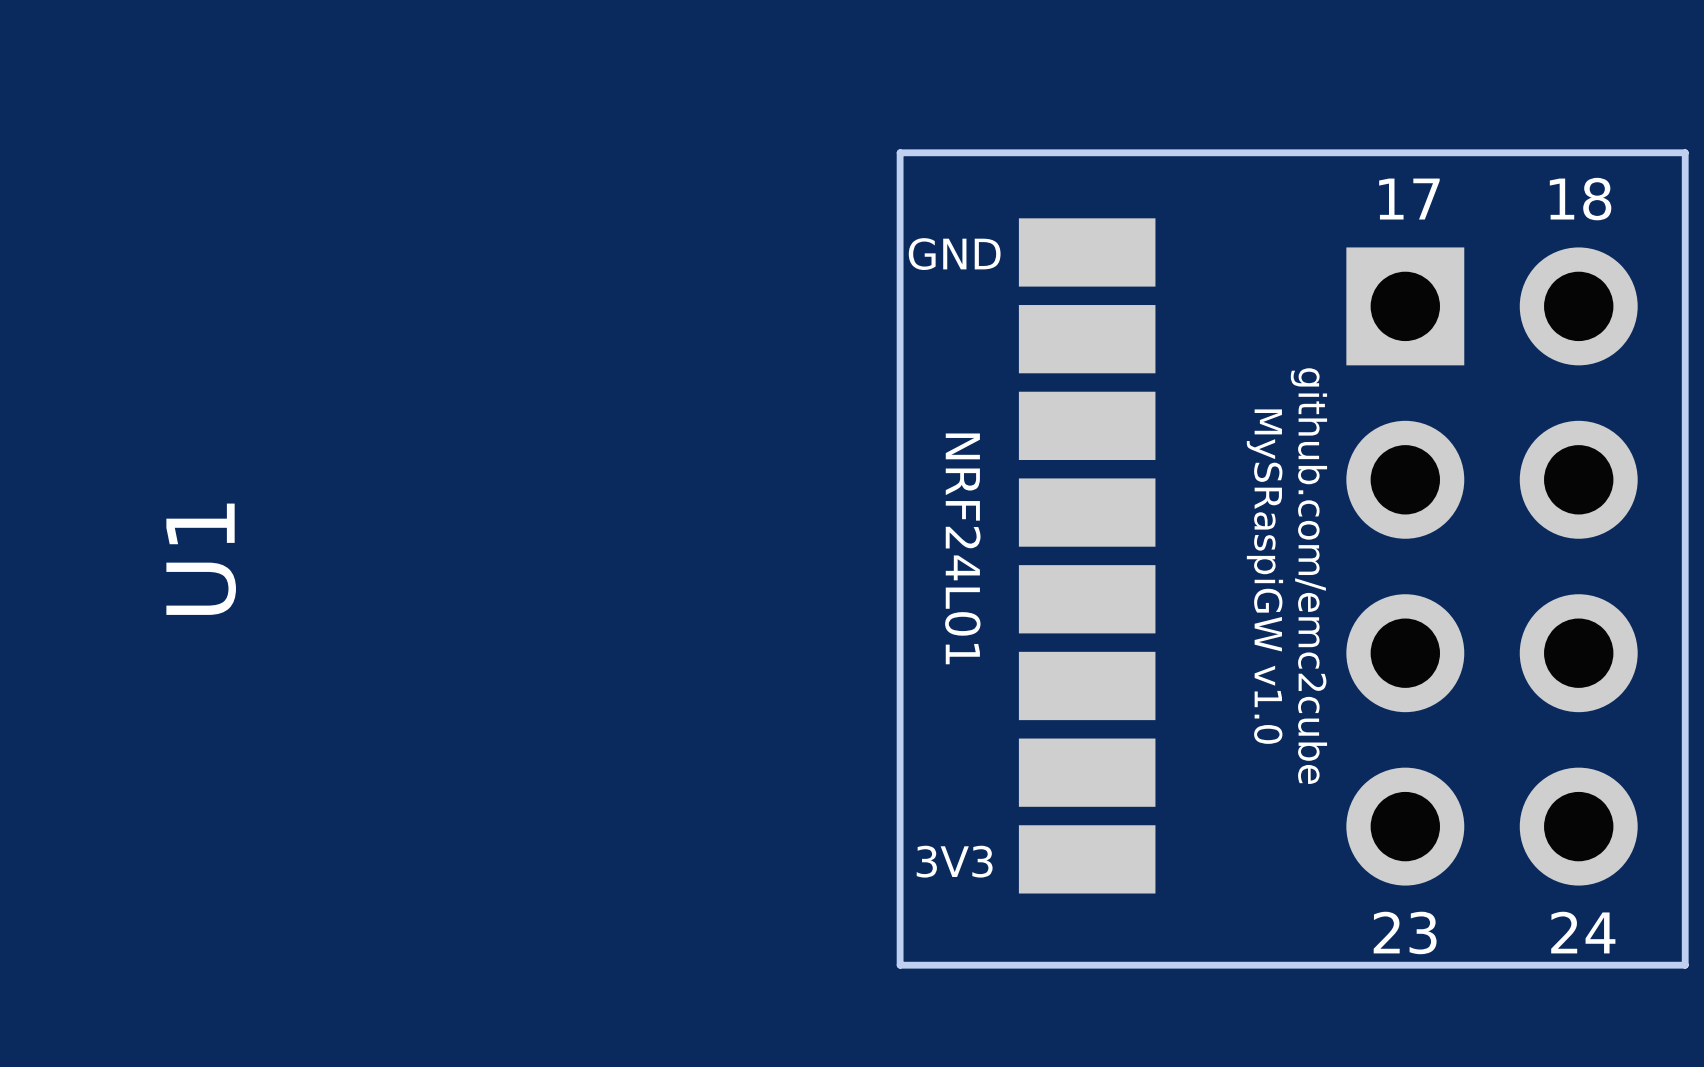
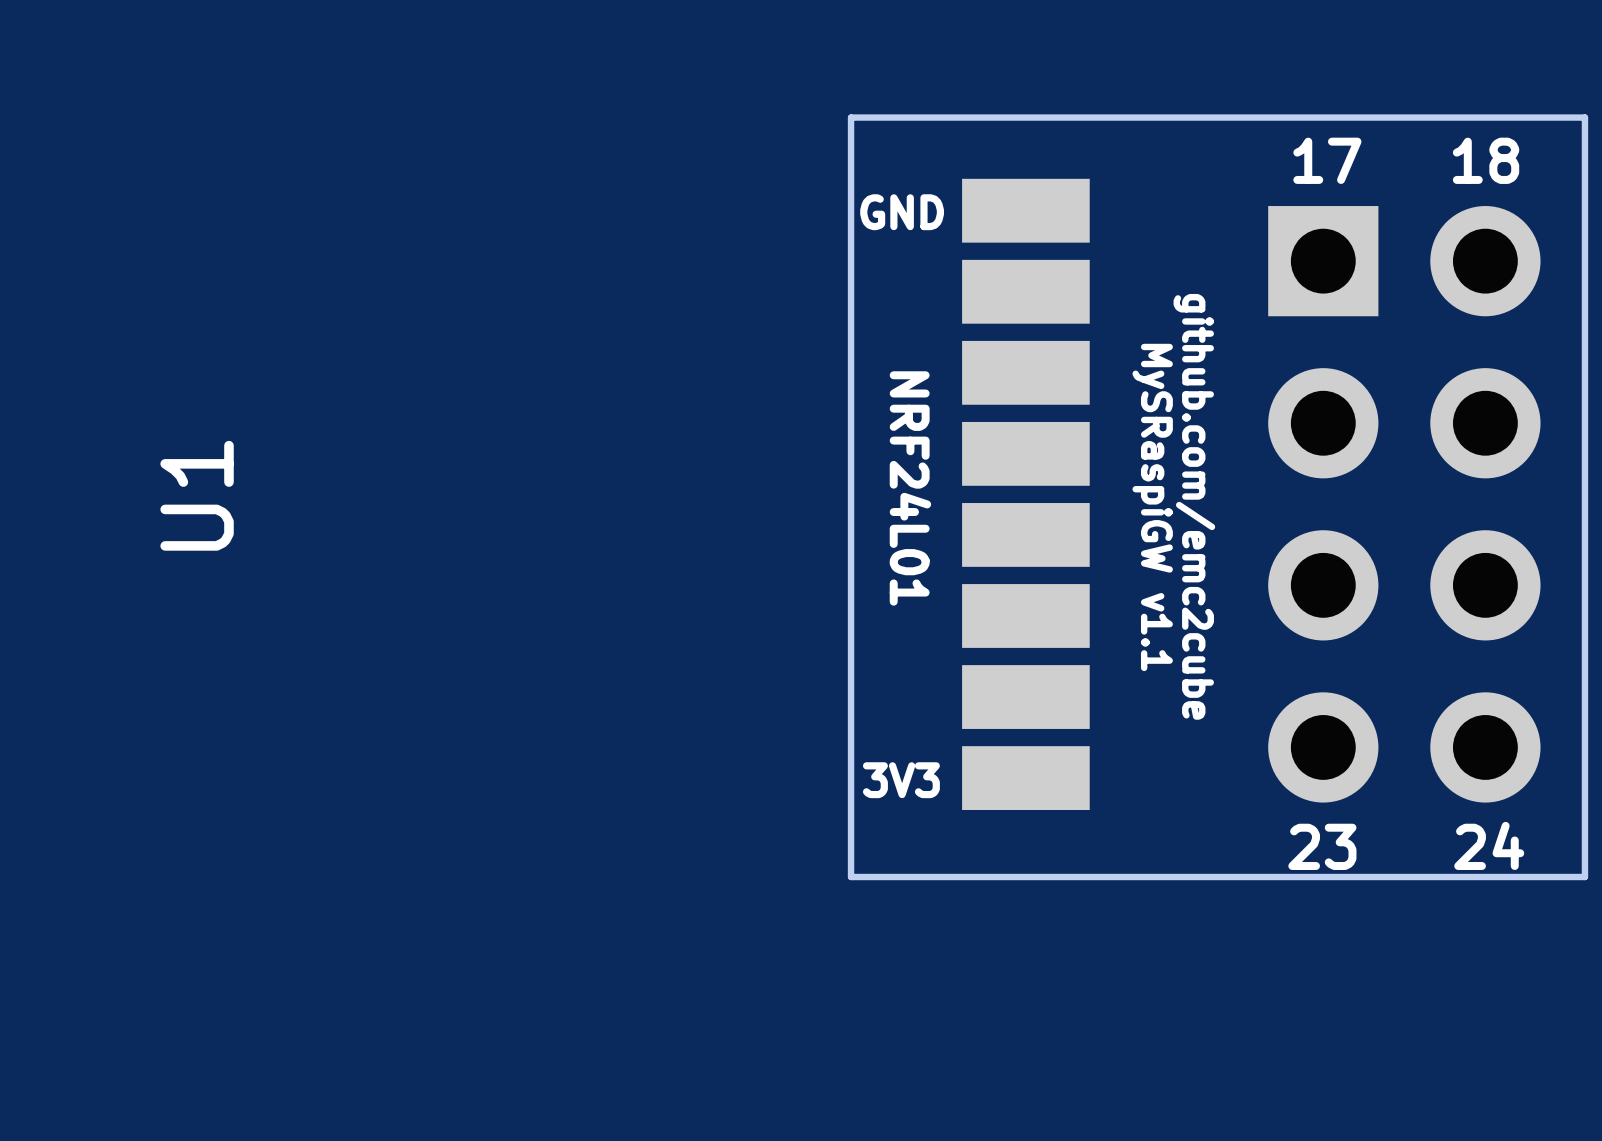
text: MySRaspiGW v1.0 (1264, 576) -> MySRaspiGW v1.1 (1152, 507)
text position: github.com/emc2cube (1308, 576) -> github.com/emc2cube (1194, 506)

